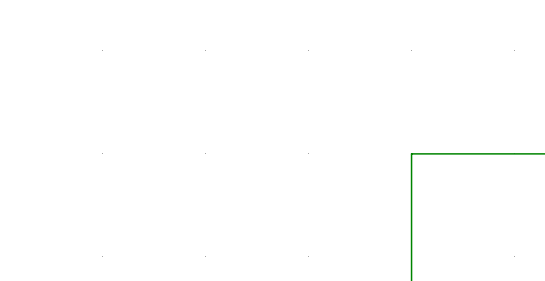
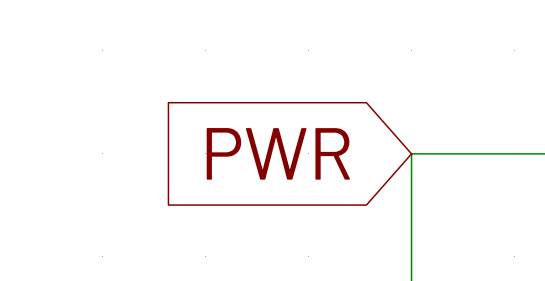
global label: none -> PWR (278, 153)

